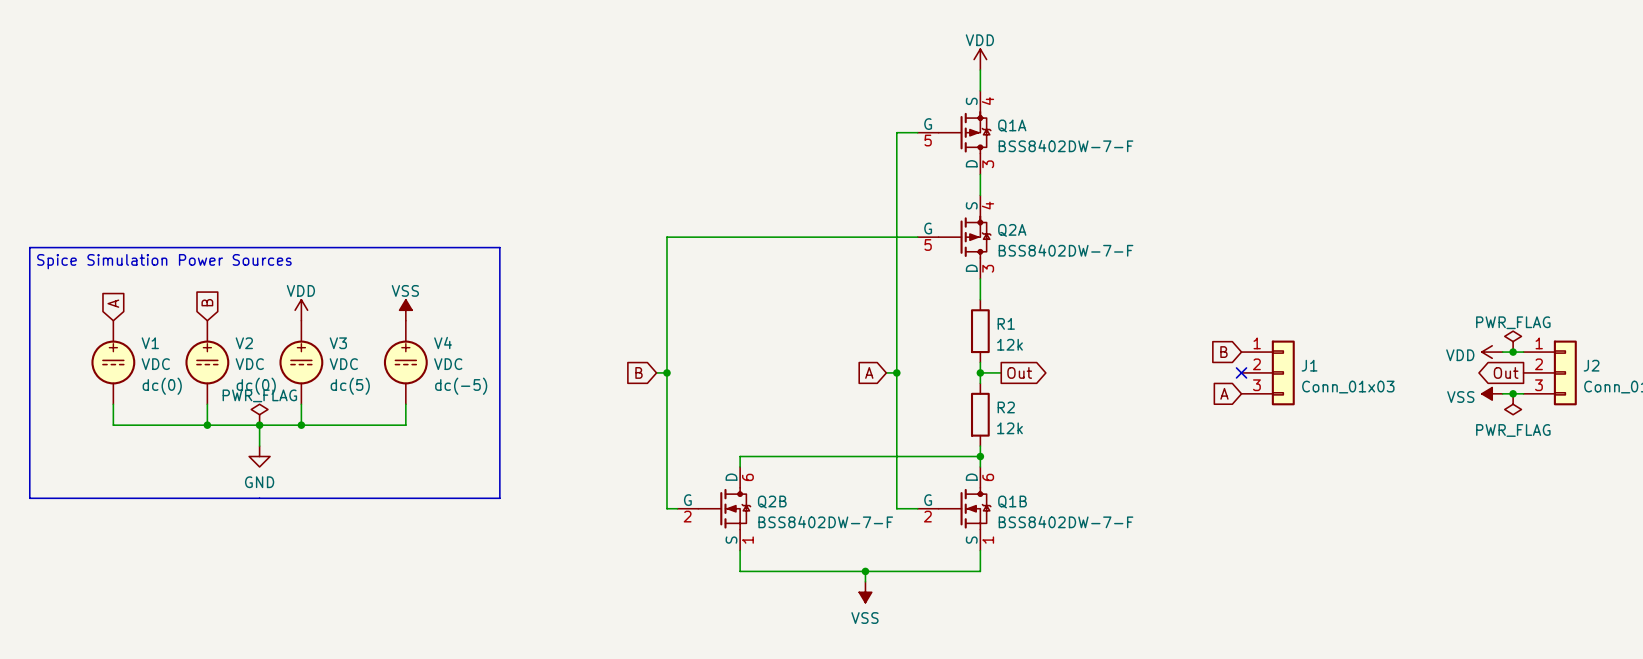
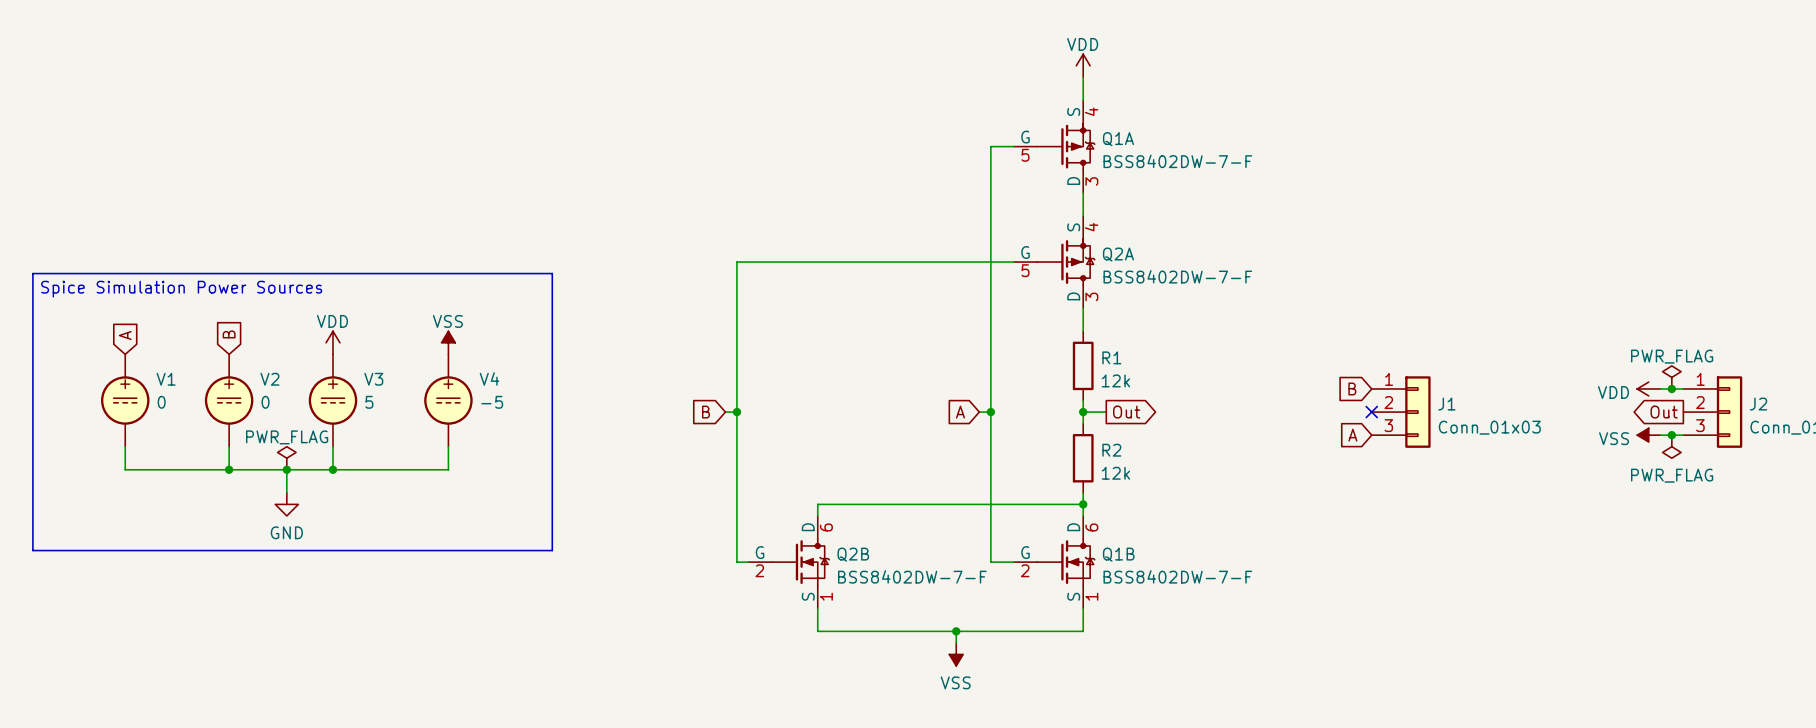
V1 value: VDC (155, 364) -> 0 (161, 402)
V2 value: VDC (249, 364) -> 0 (265, 402)
V3 value: VDC (343, 364) -> 5 (369, 402)
V4 value: VDC (448, 364) -> -5 (492, 402)
V1 text: dc(0) (162, 386) -> none
V2 text: dc(0) (256, 386) -> none
V3 text: dc(5) (350, 386) -> none
V4 text: dc(-5) (461, 386) -> none

